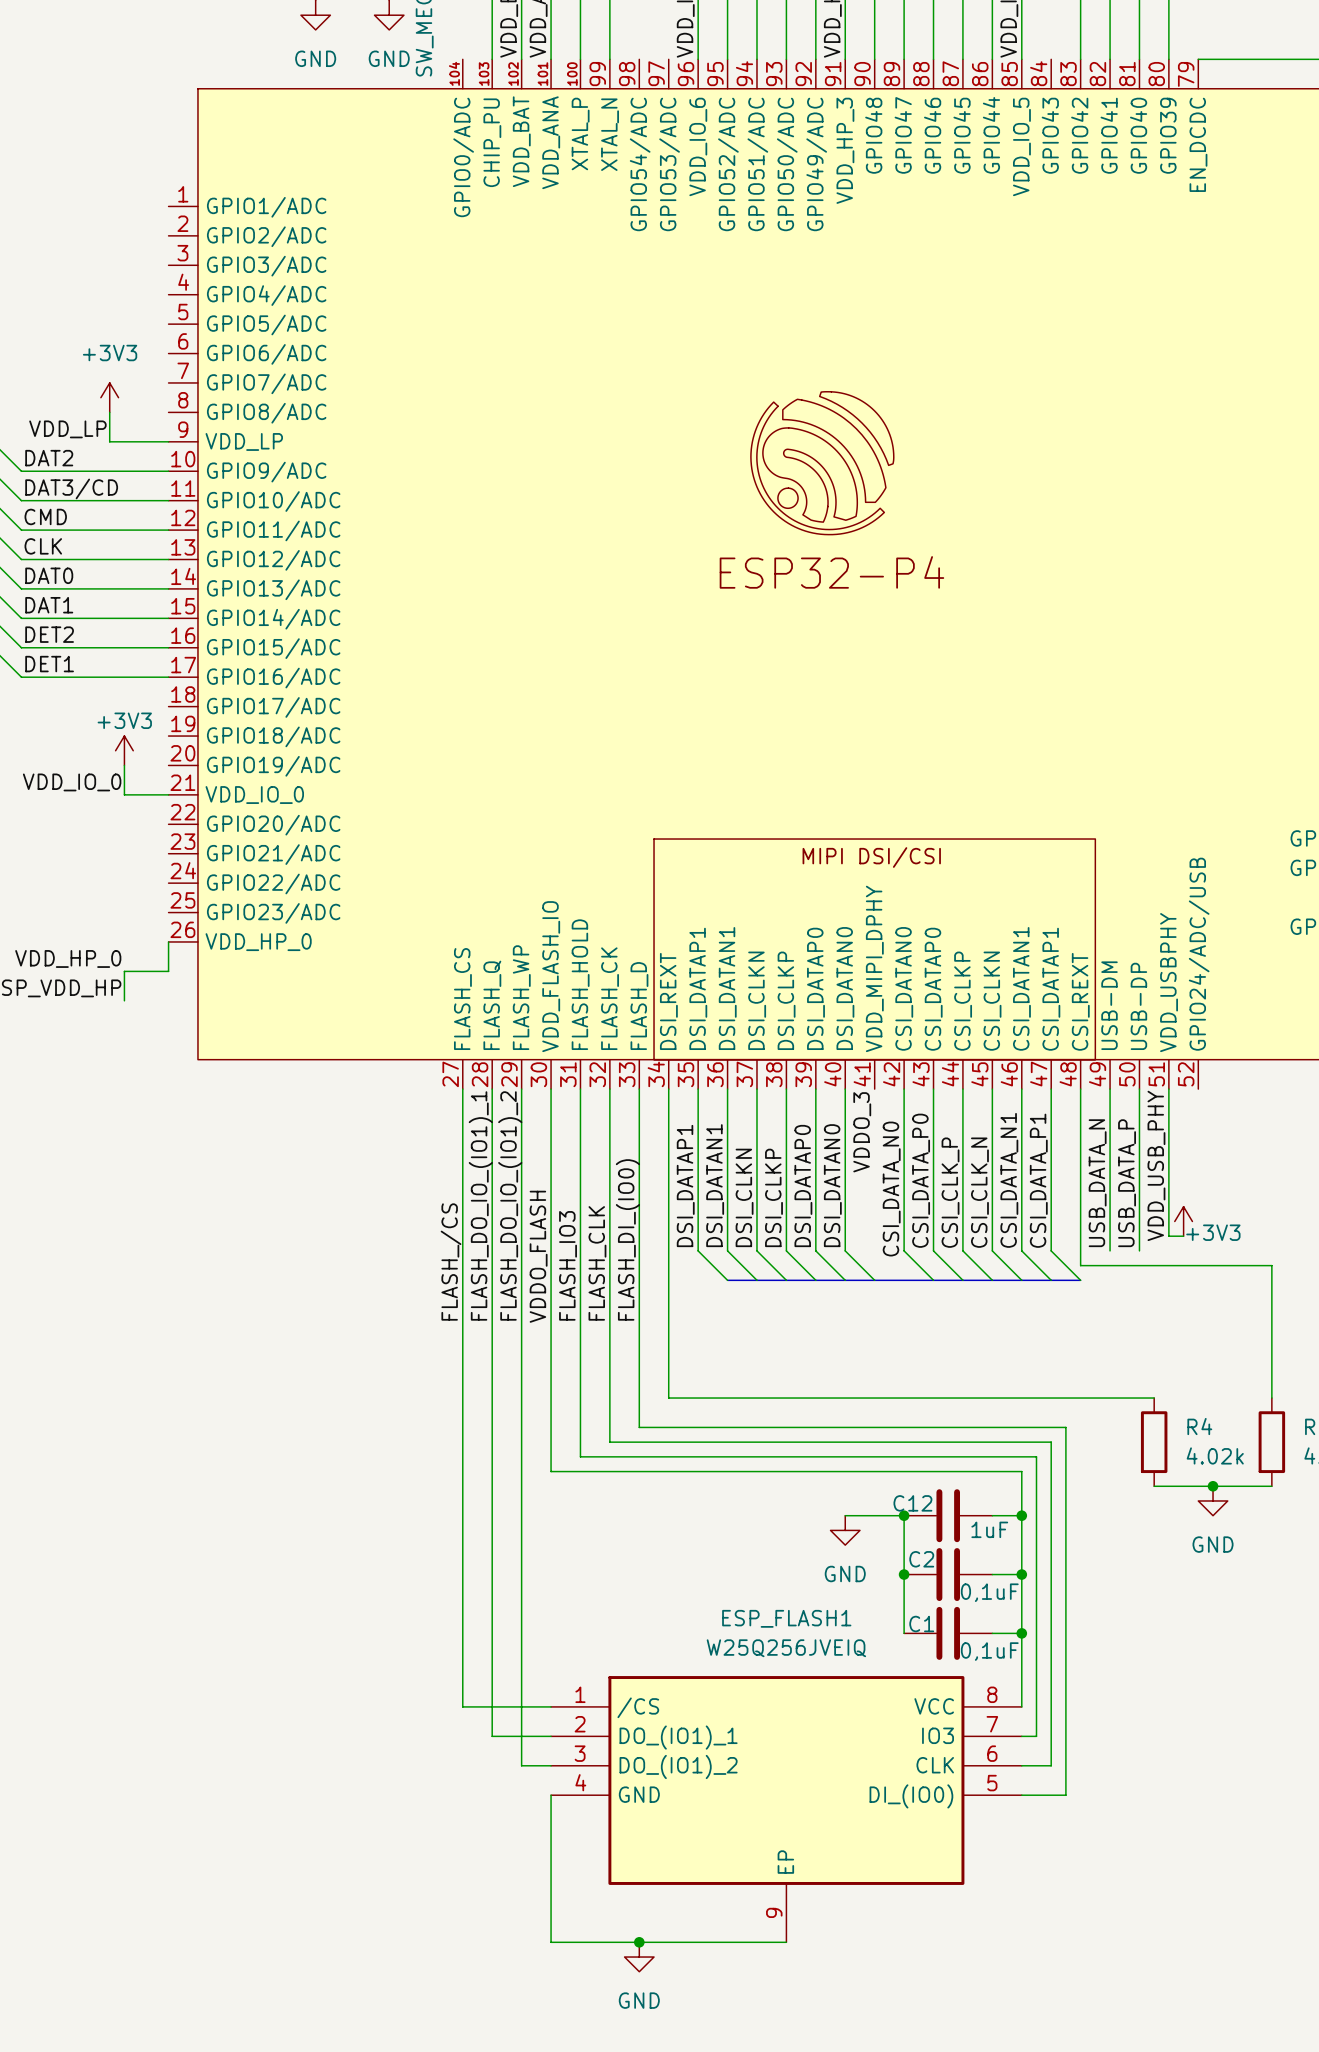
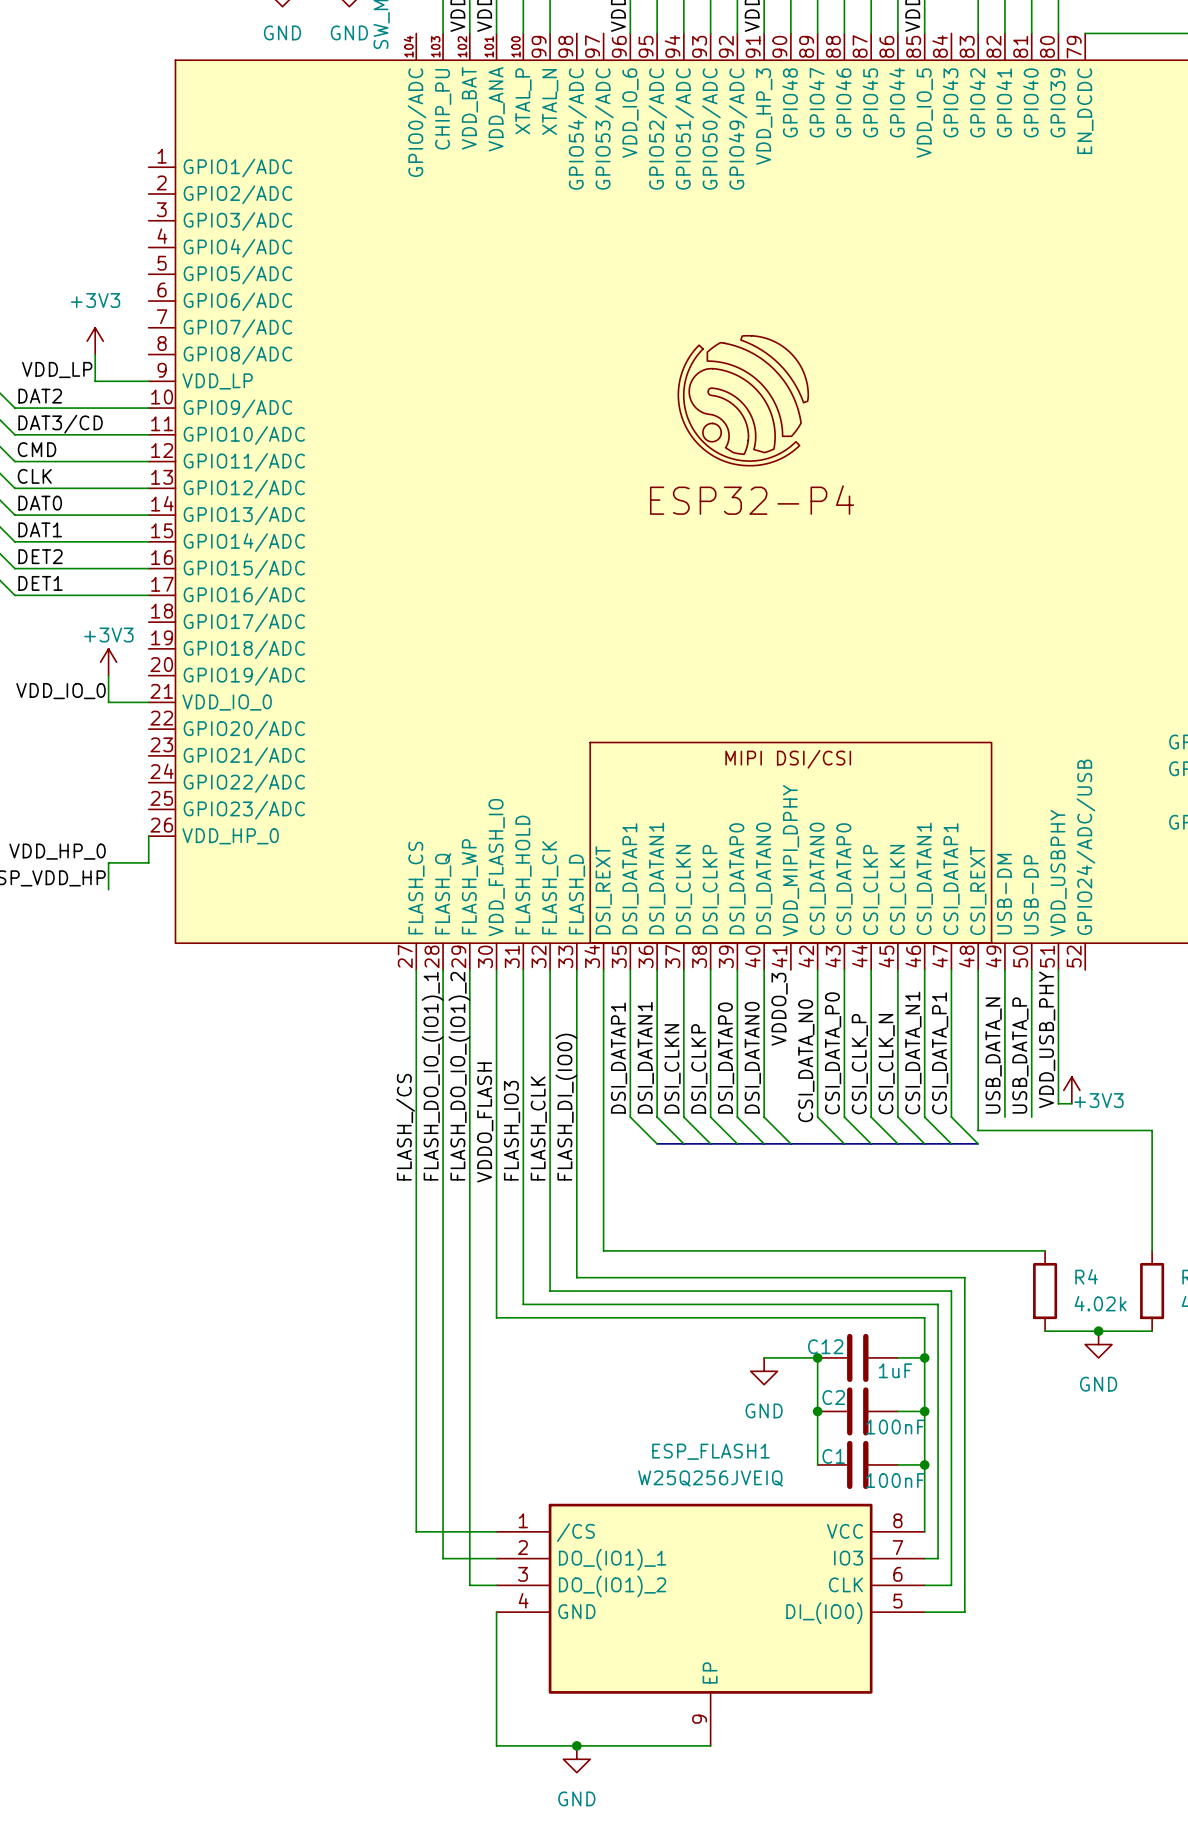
C2 value: 0,1uF (989, 1592) -> 100nF (895, 1427)
C1 value: 0,1uF (989, 1651) -> 100nF (895, 1480)

